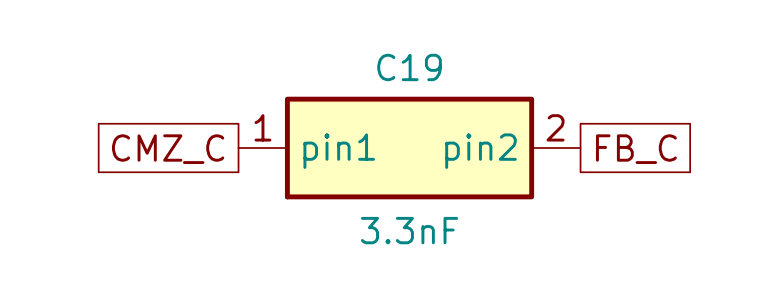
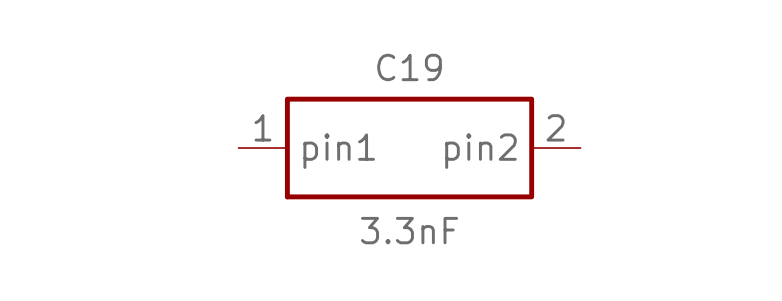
global label: CMZ_C (168, 149) -> none
global label: FB_C (636, 149) -> none

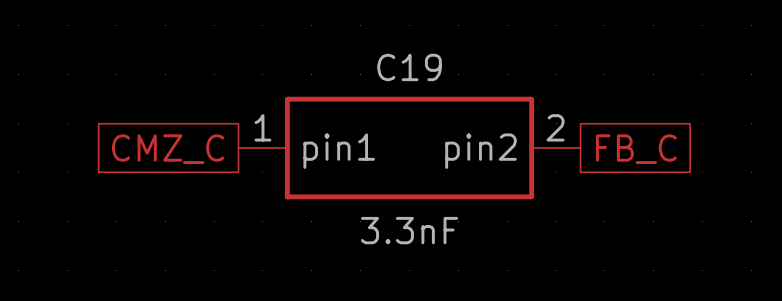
global label: none -> CMZ_C (168, 149)
global label: none -> FB_C (636, 149)

